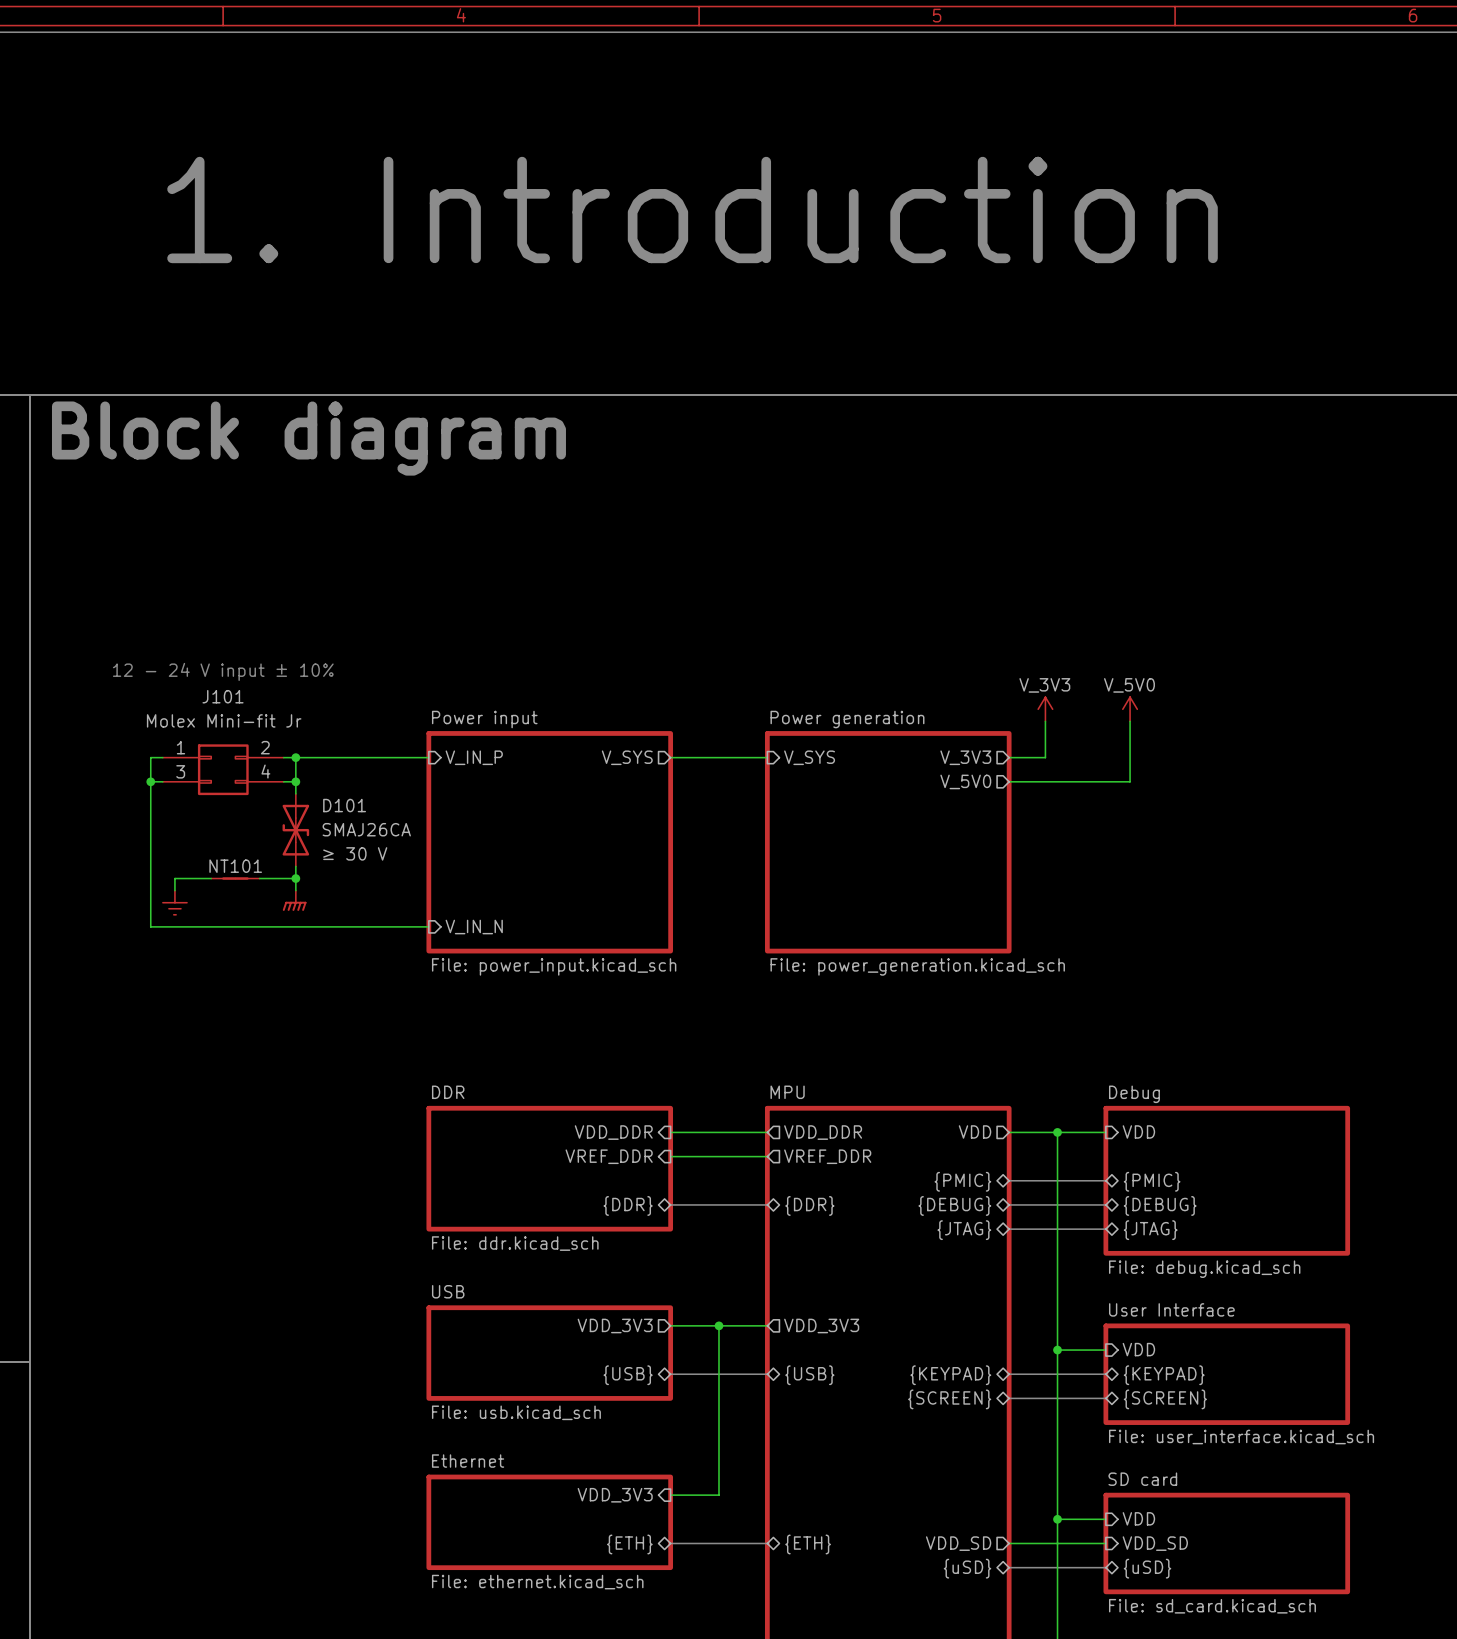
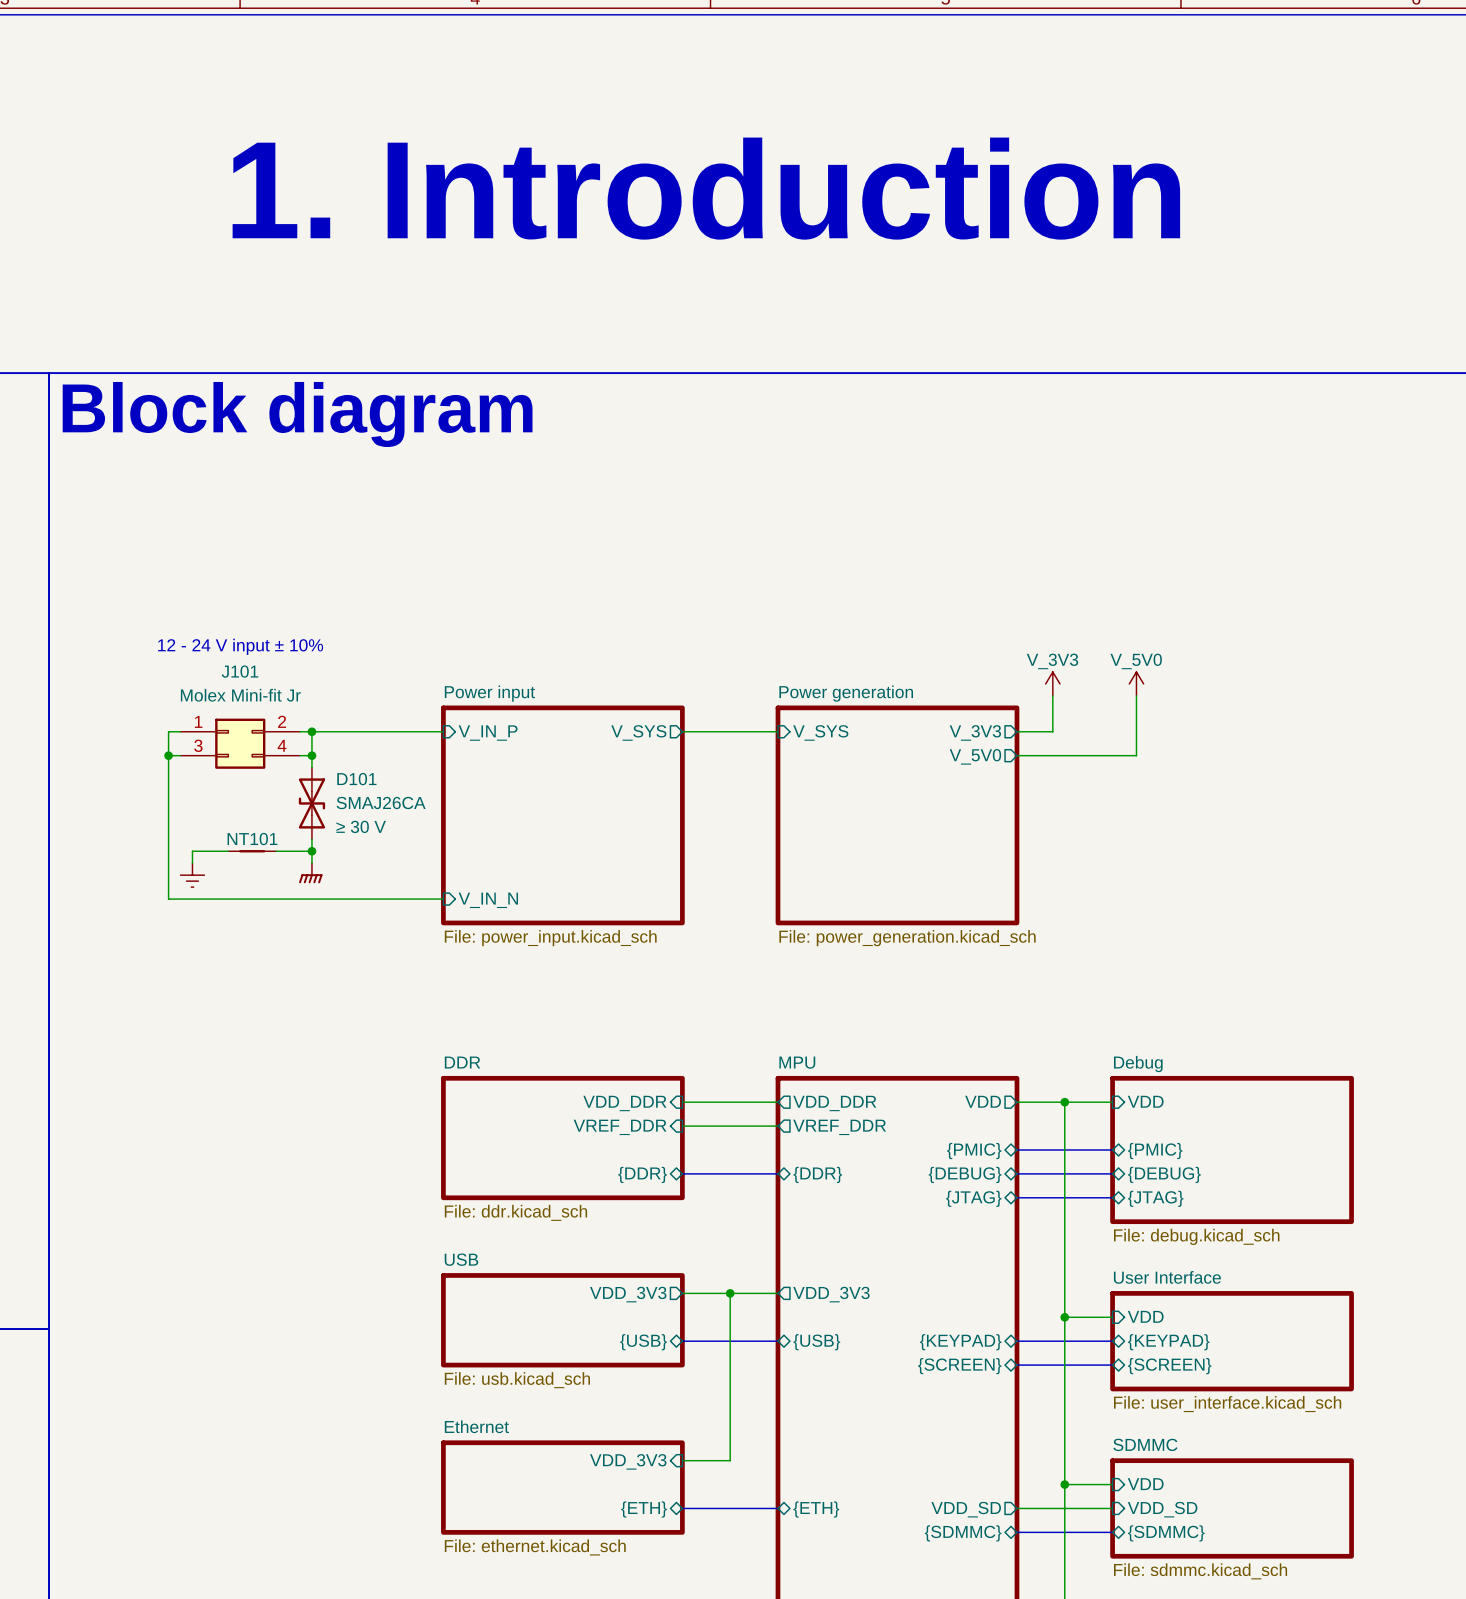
sheet SD card name: SD card (1142, 1479) -> SDMMC (1145, 1444)
sheet pin: {uSD} (967, 1568) -> {SDMMC} (963, 1533)
sheet pin: {uSD} (1147, 1568) -> {SDMMC} (1166, 1533)
sheet SD card value: File: sd_card.kicad_sch (1212, 1606) -> File: sdmmc.kicad_sch (1200, 1571)

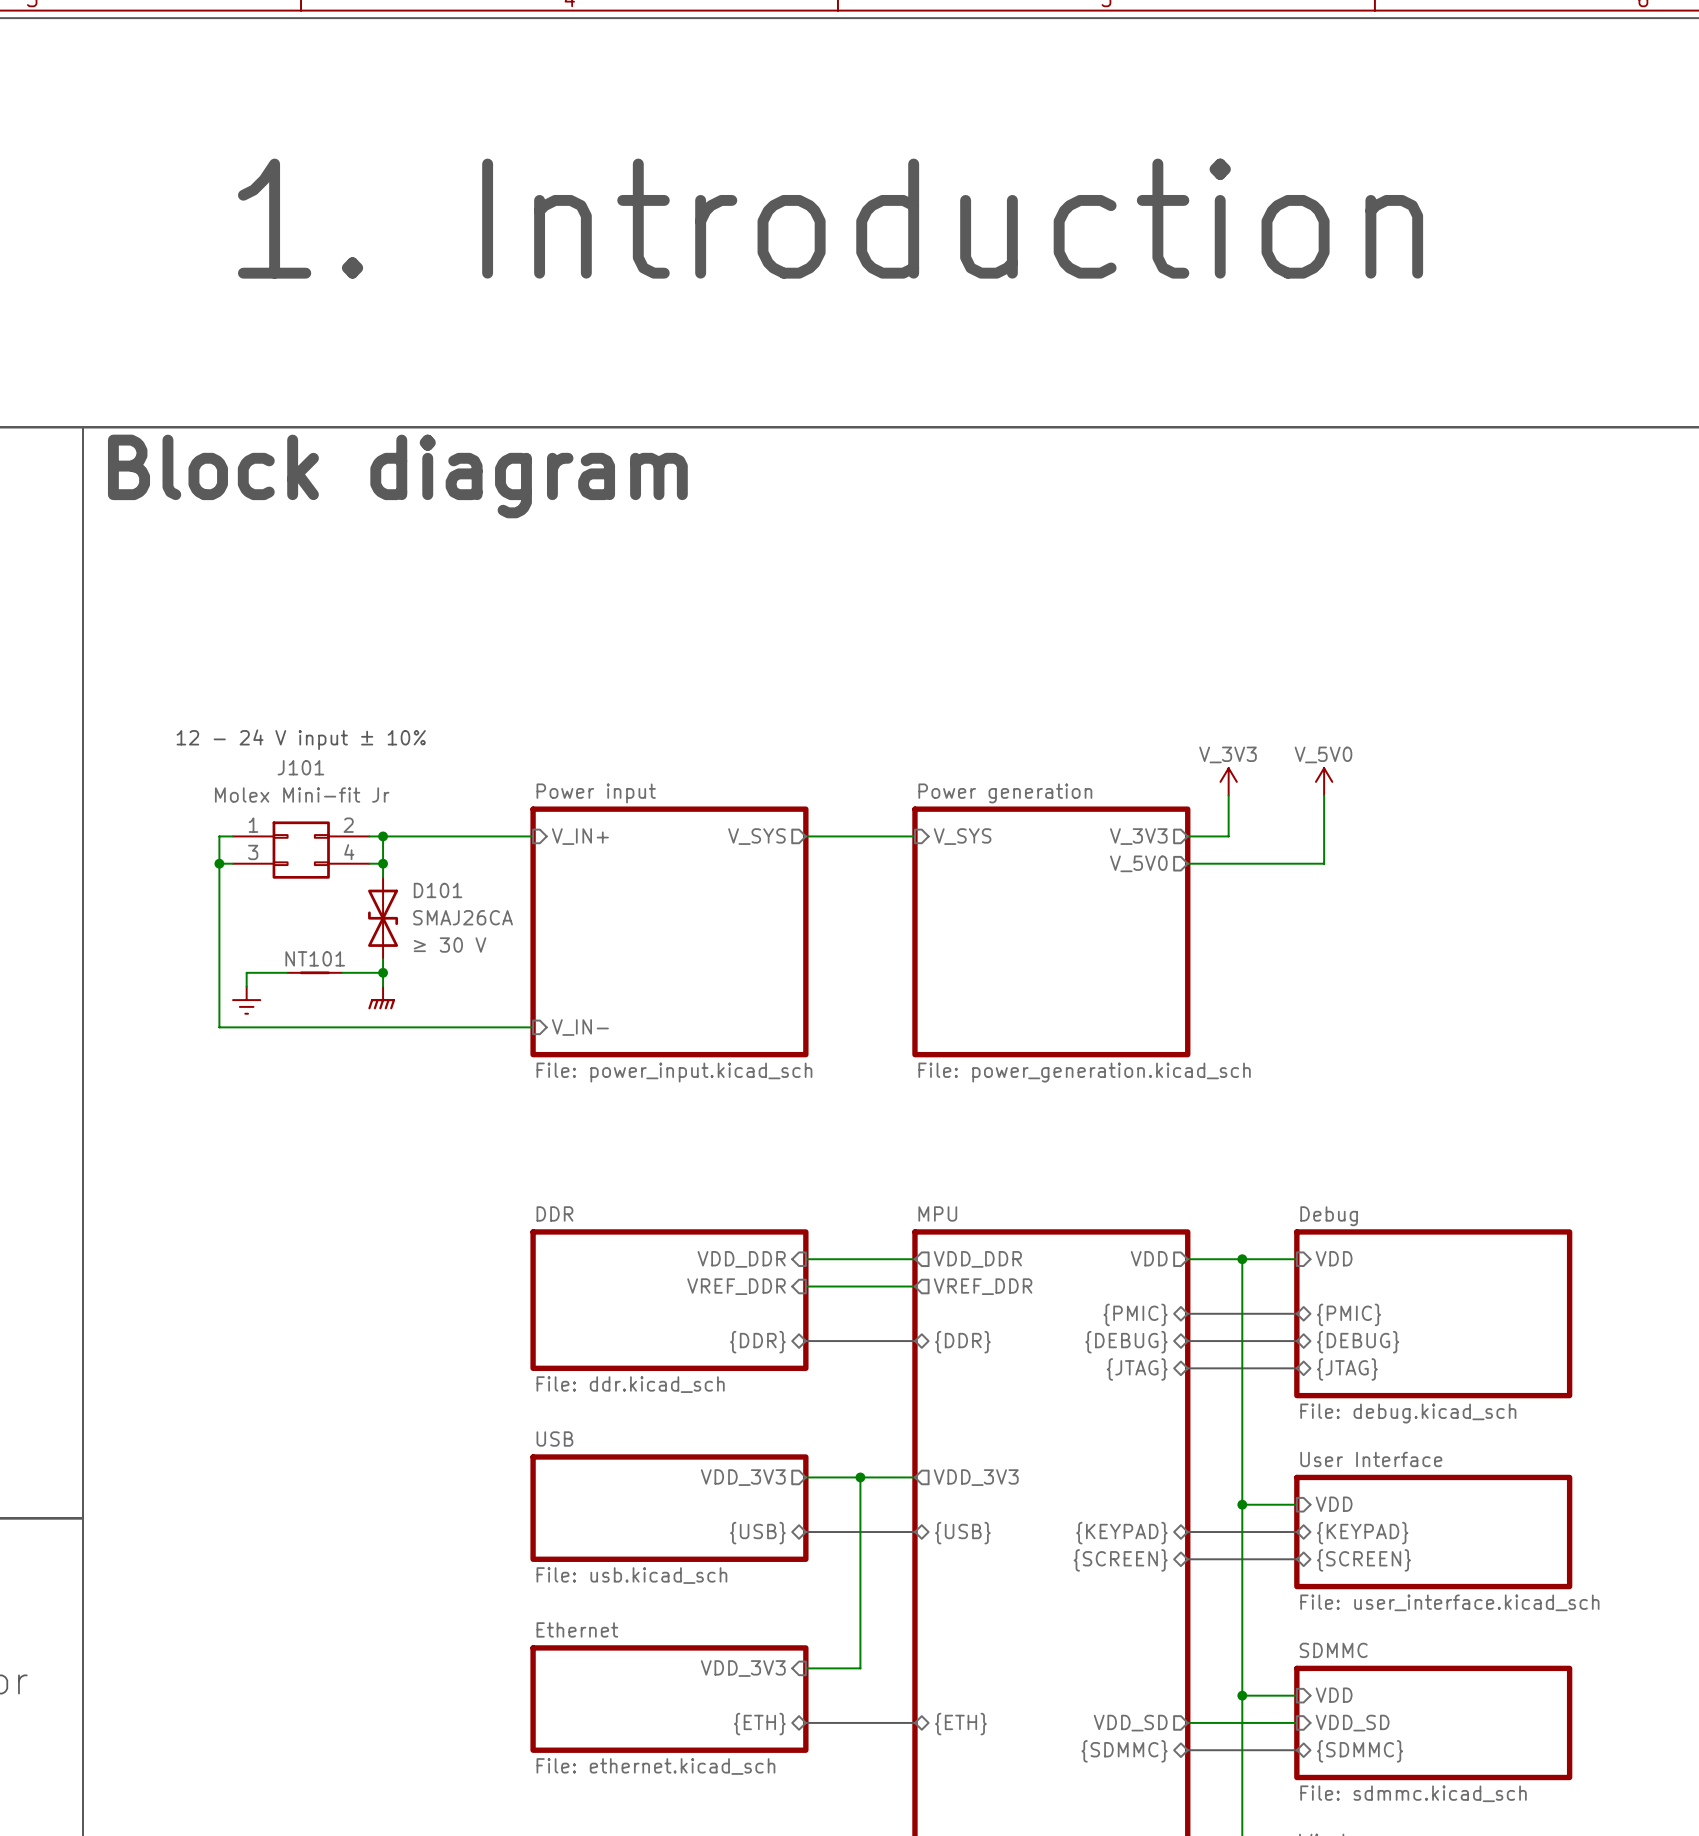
sheet pin: V_IN_P (488, 733) -> V_IN+ (580, 836)
sheet pin: V_IN_N (488, 900) -> V_IN- (580, 1027)

